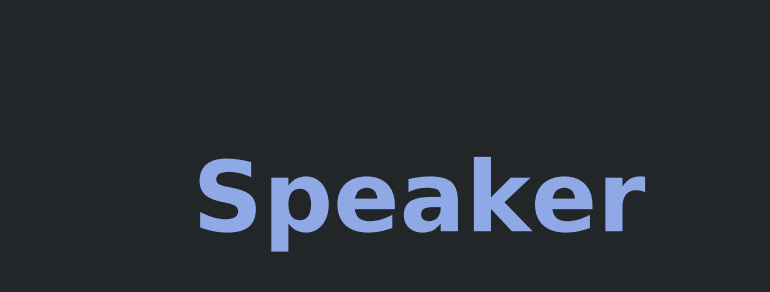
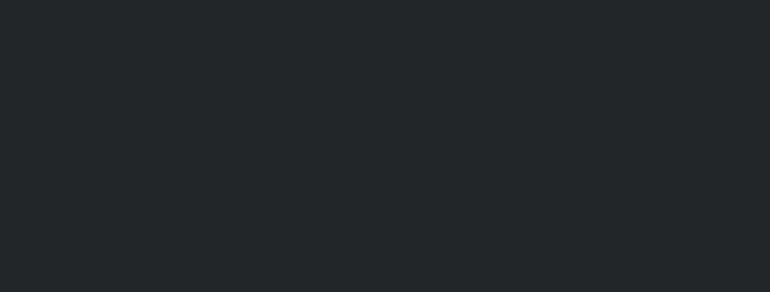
text: Speaker (422, 204) -> none

